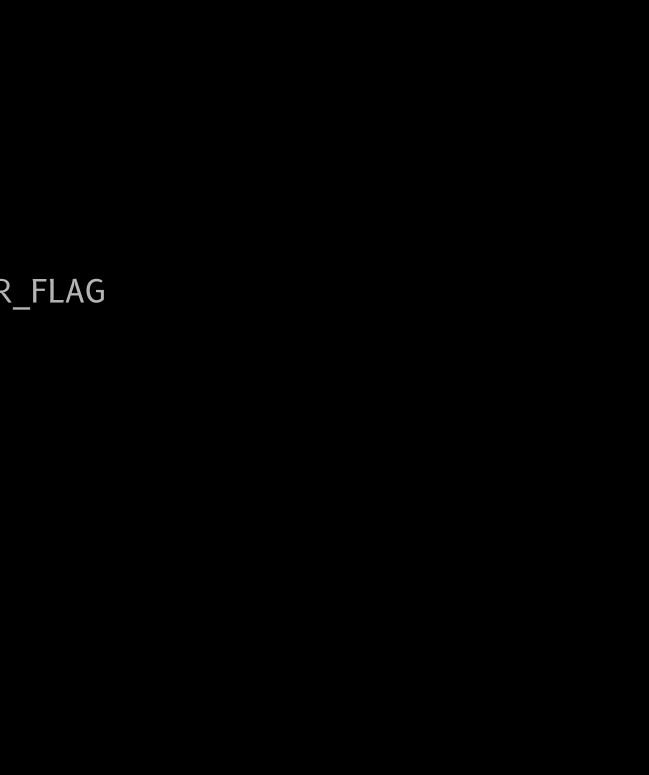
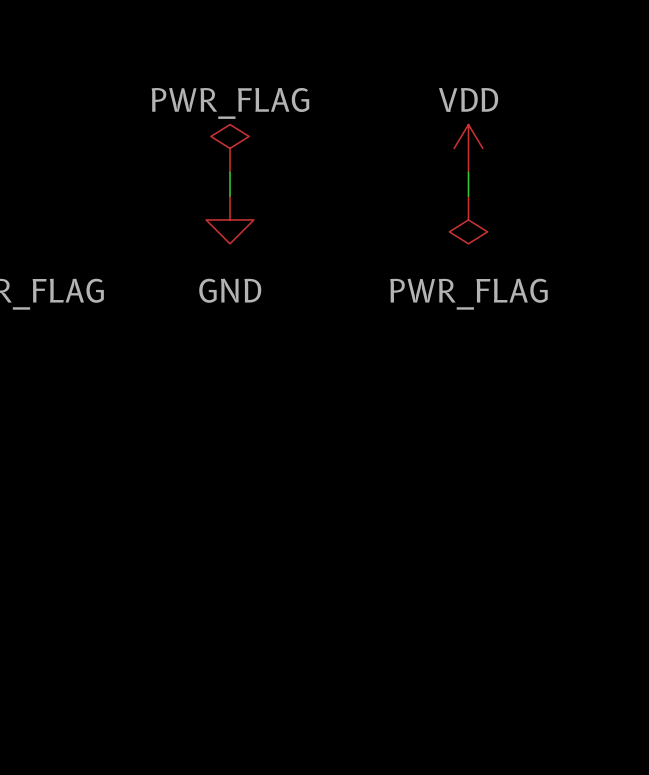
power symbol: none -> PWR_FLAG (230, 148)
power symbol: none -> VDD (468, 148)
wire: none -> (230, 172) (230, 196)
wire: none -> (468, 172) (468, 196)
power symbol: none -> GND (230, 219)
power symbol: none -> PWR_FLAG (468, 219)

